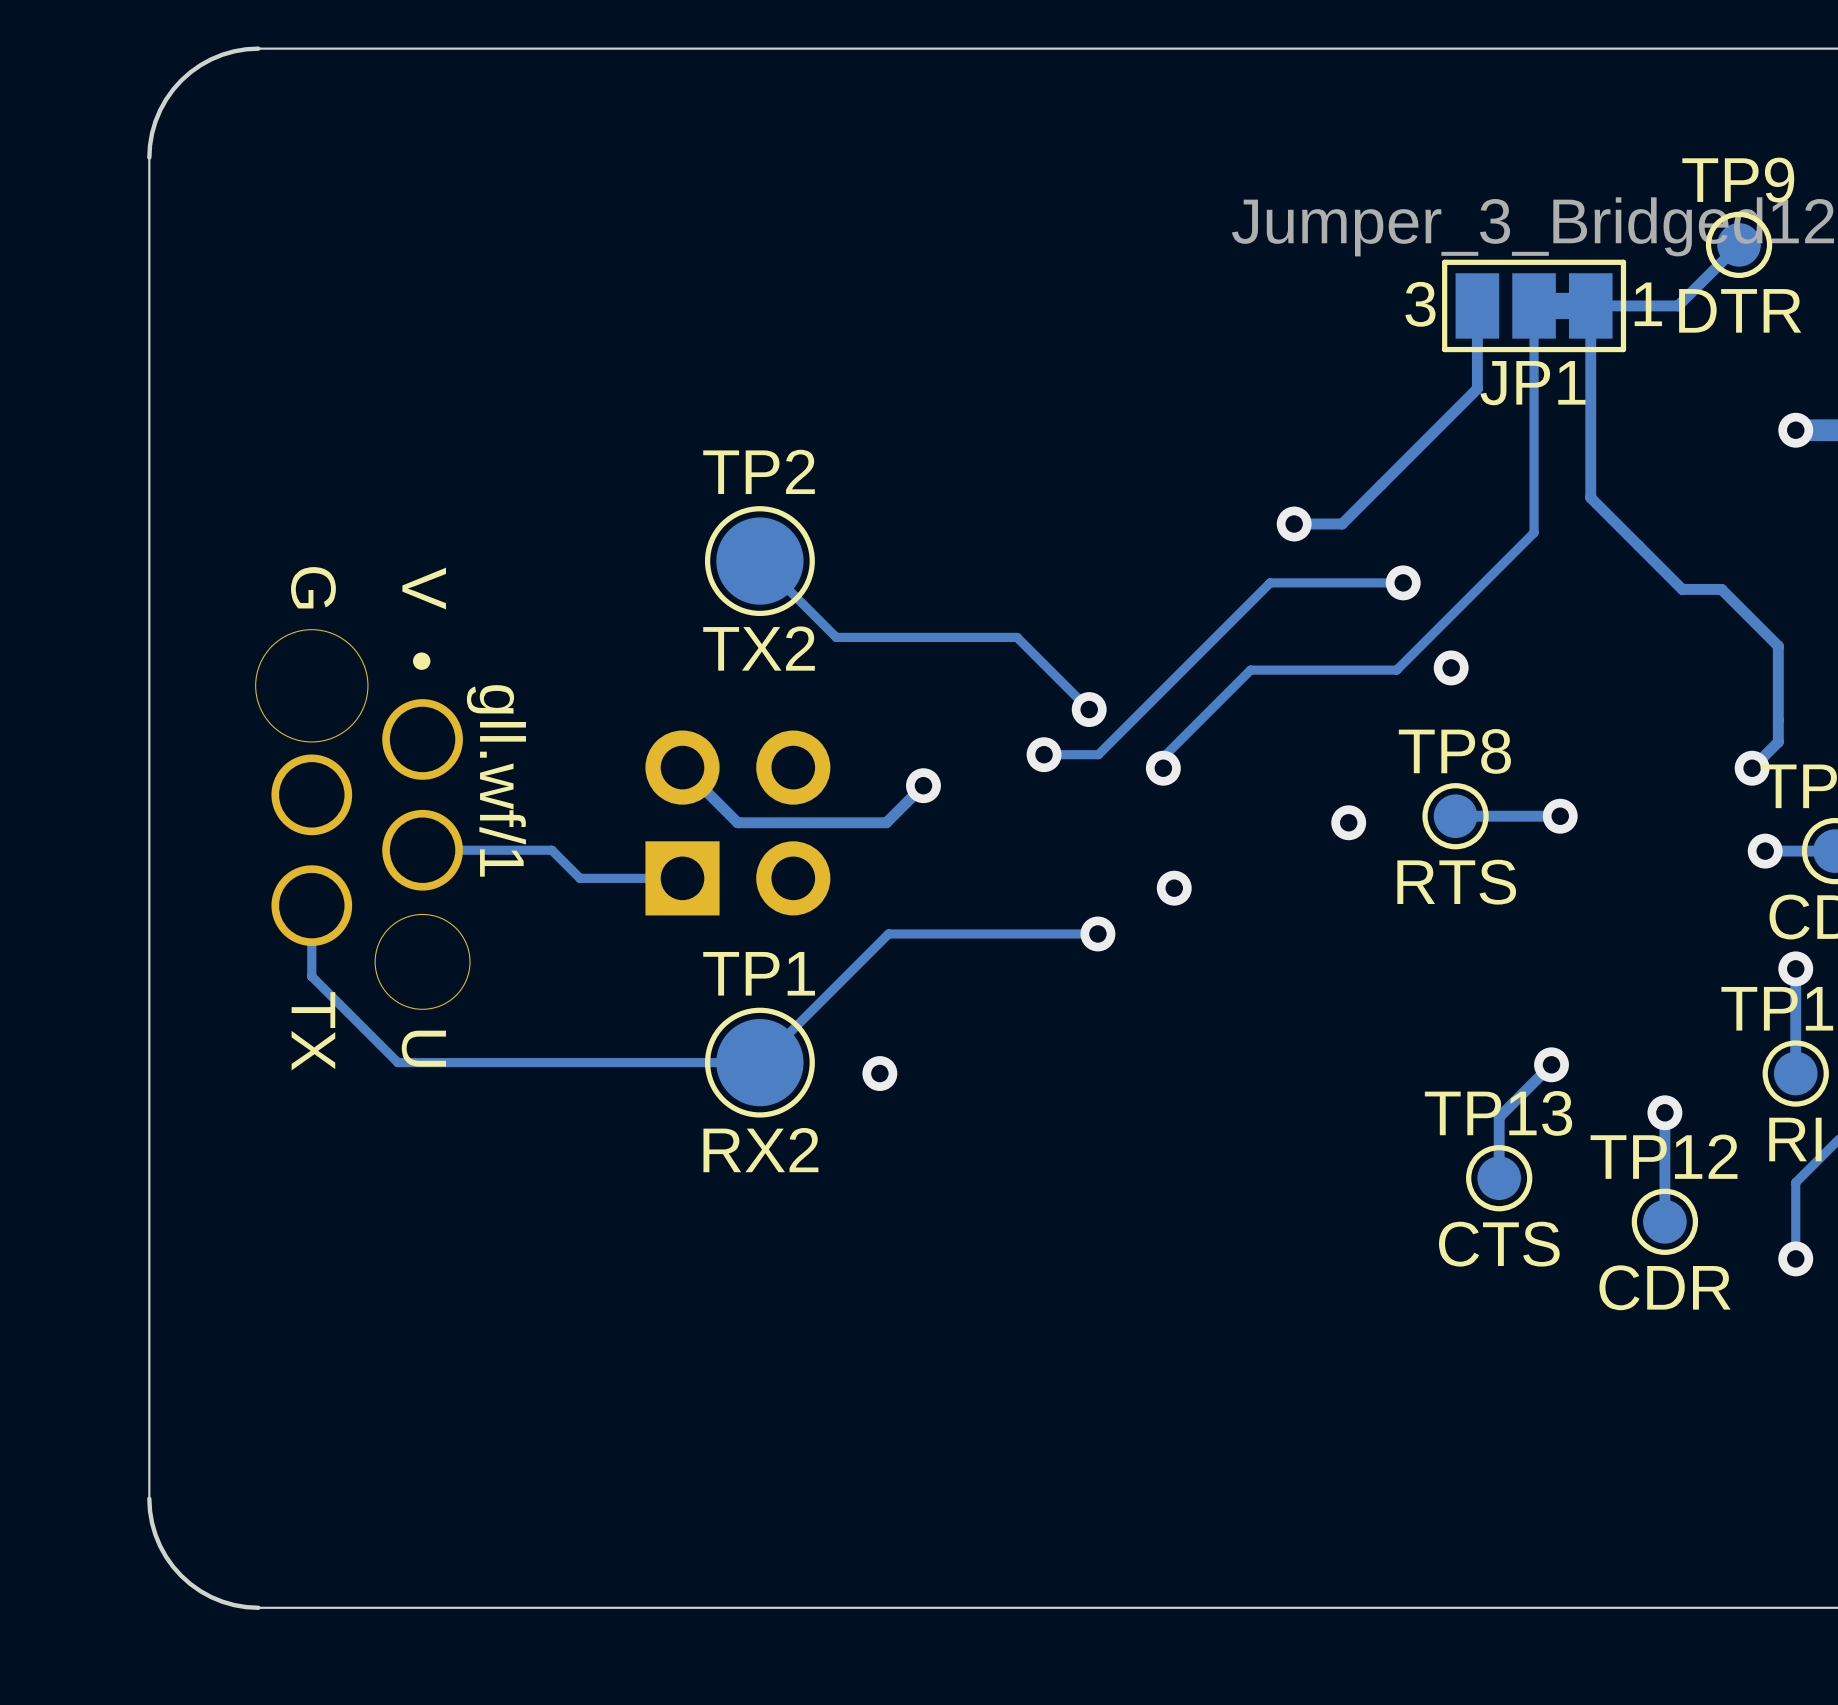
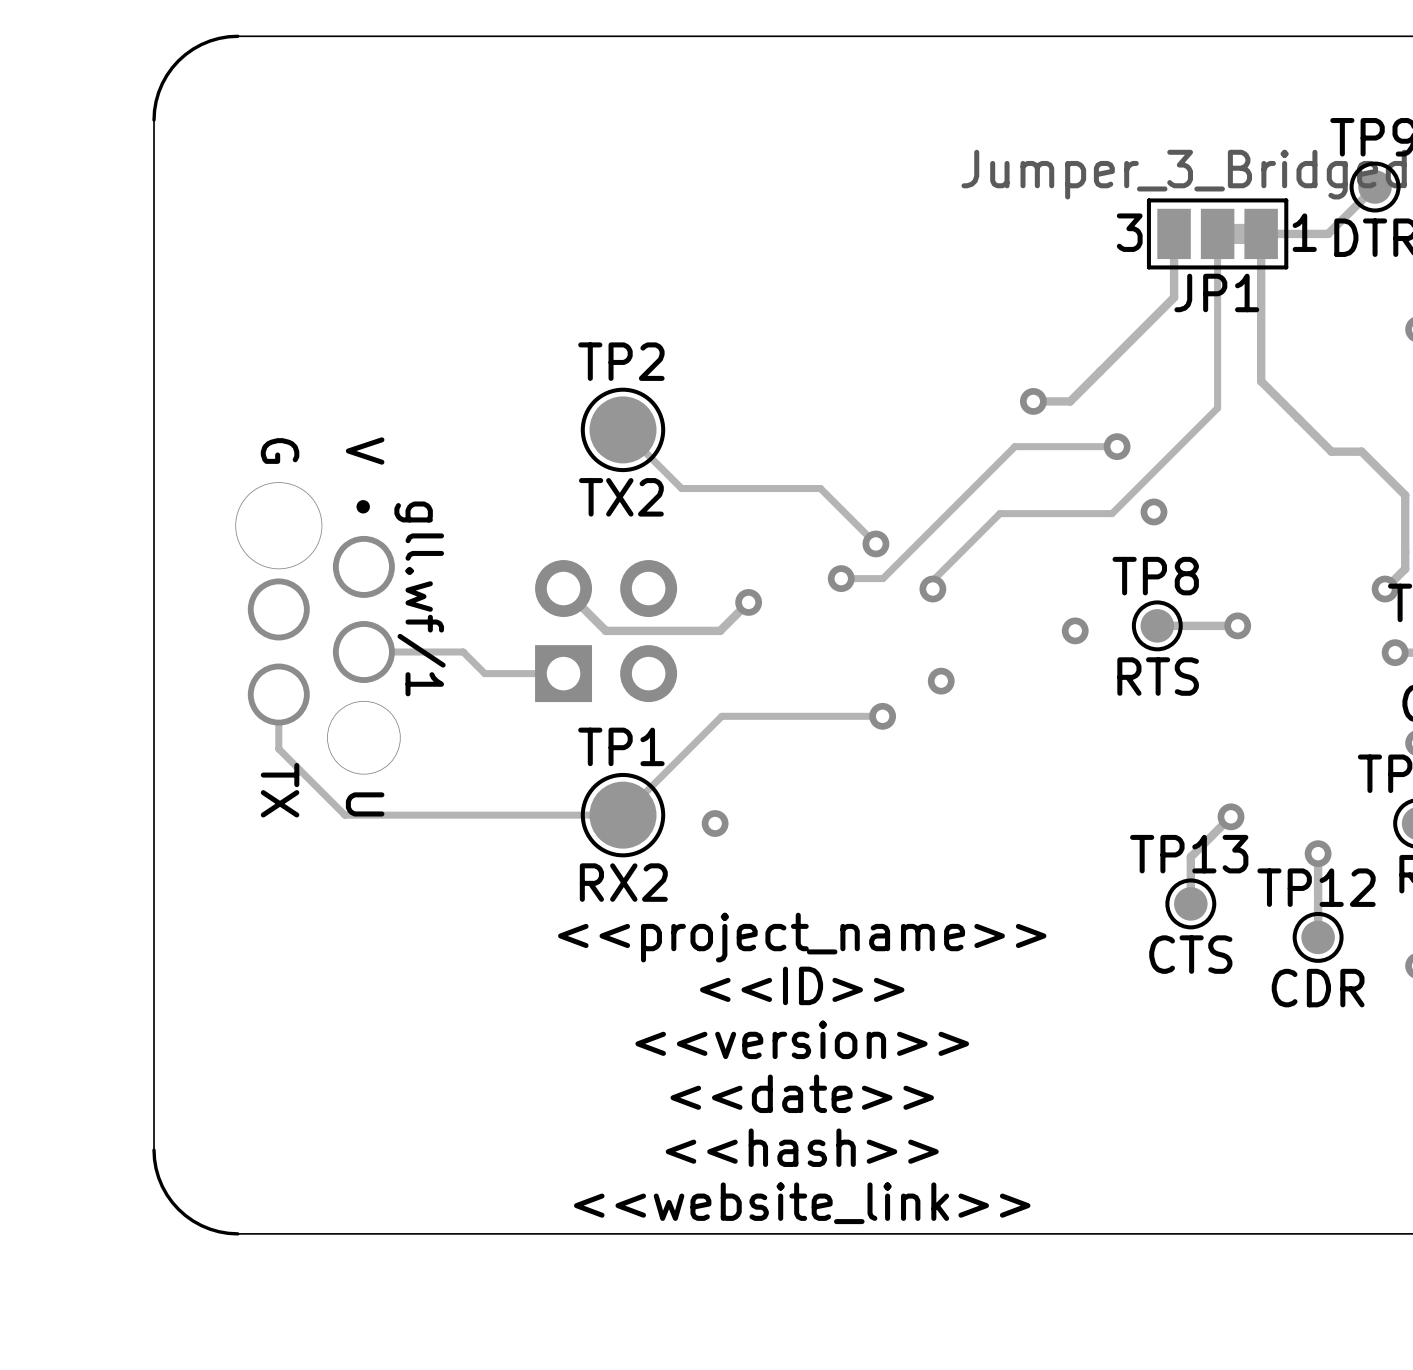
text: none -> <<project_name>> (802, 937)
text: none -> <<ID>> (802, 985)
text: none -> <<version>> (802, 1039)
text: none -> <<date>> (802, 1093)
text: none -> <<hash>> (802, 1147)
text: none -> <<website_link>> (802, 1203)

